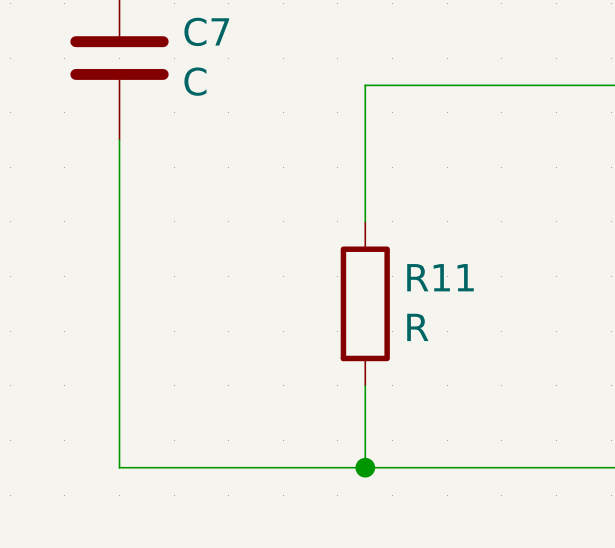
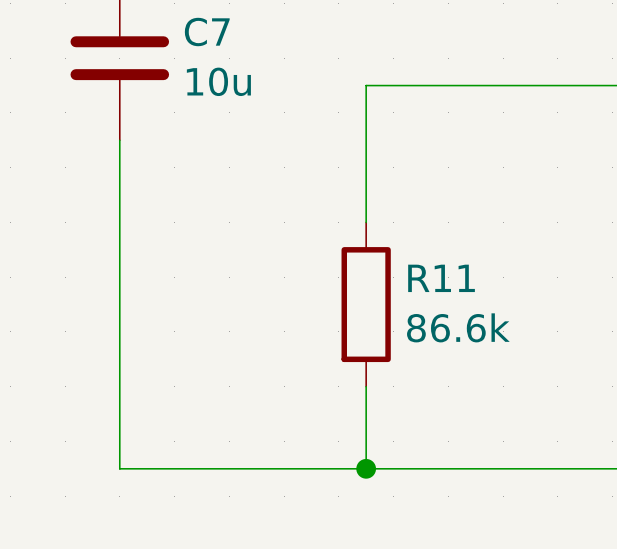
C7 value: C (195, 81) -> 10u (218, 81)
R11 value: R (417, 327) -> 86.6k (458, 327)

